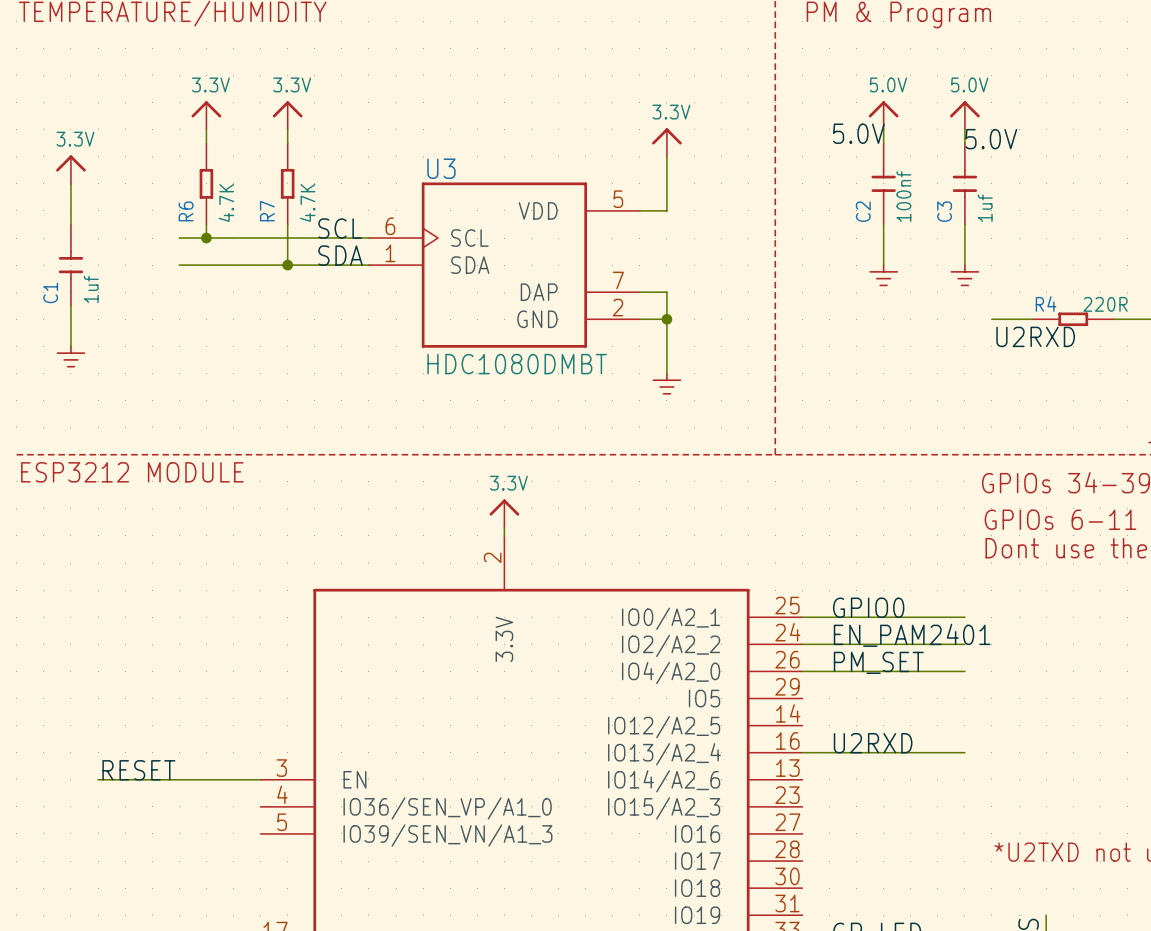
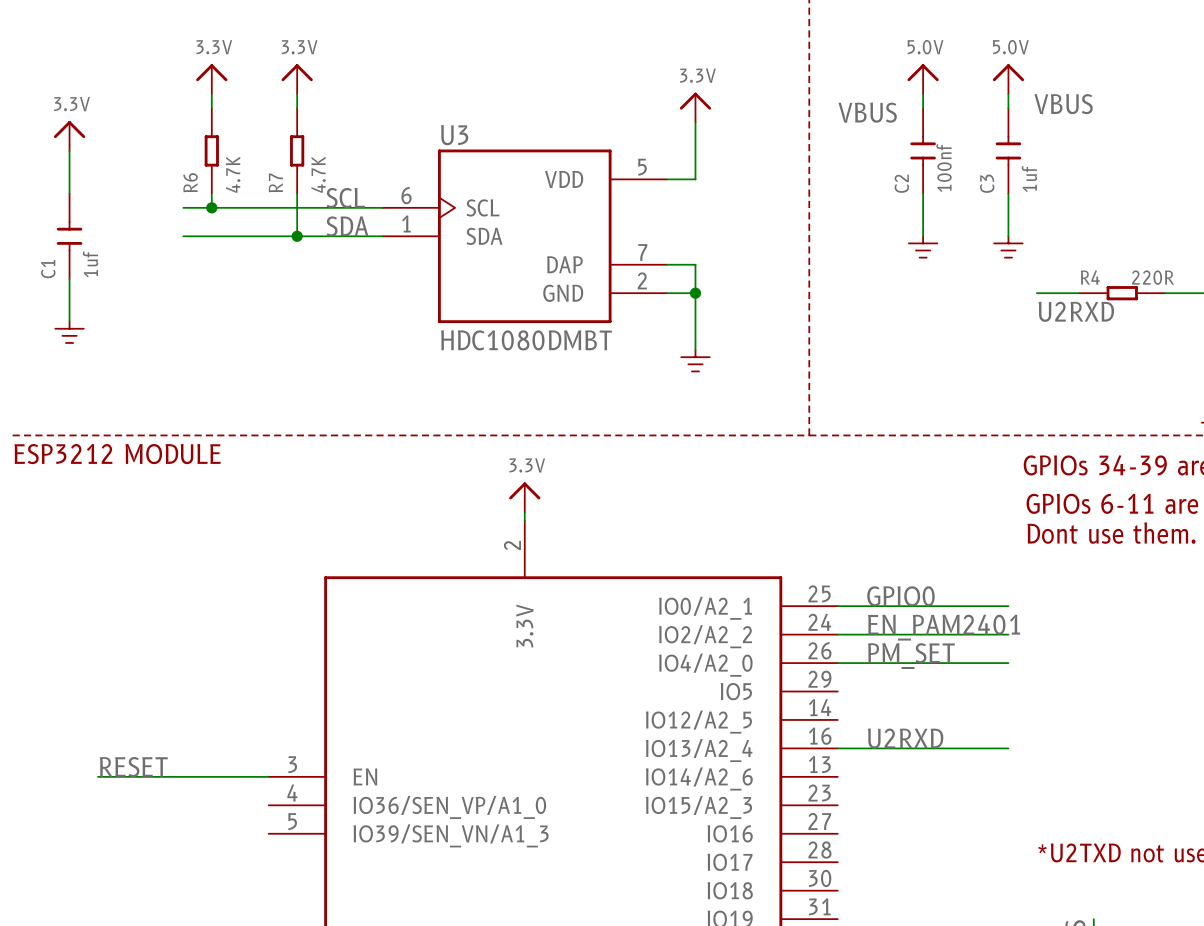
label: 5.0V (858, 133) -> none
label: 5.0V (991, 139) -> none
label: none -> VBUS (1063, 104)
label: none -> VBUS (867, 112)

